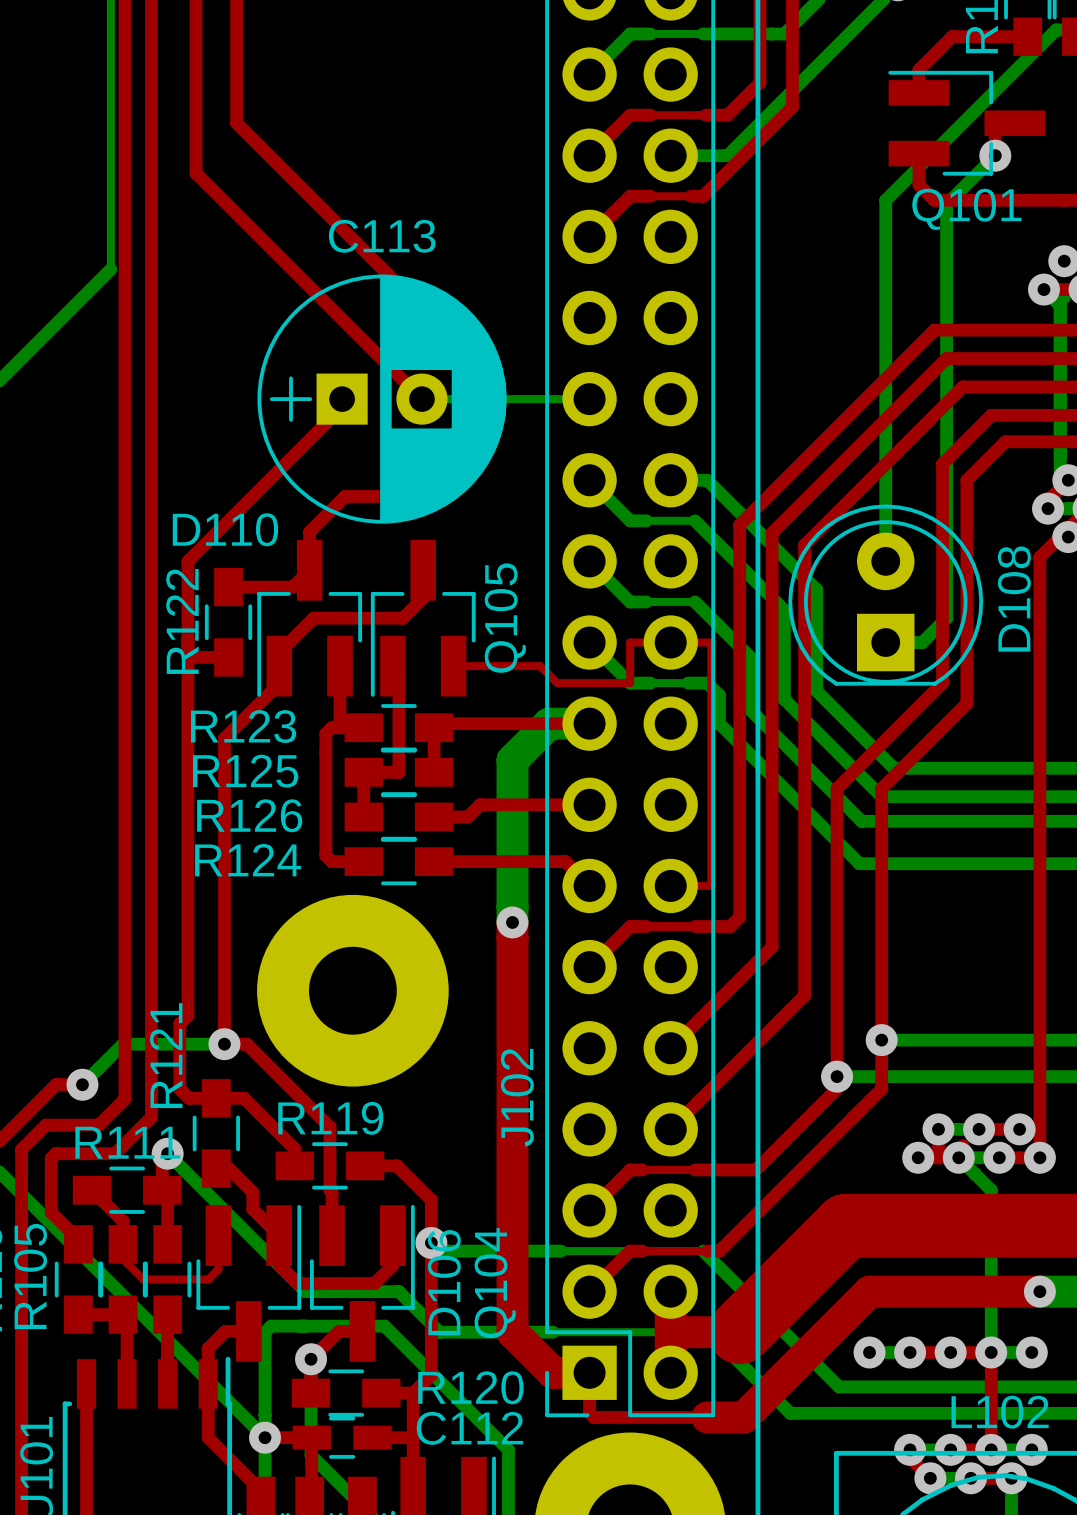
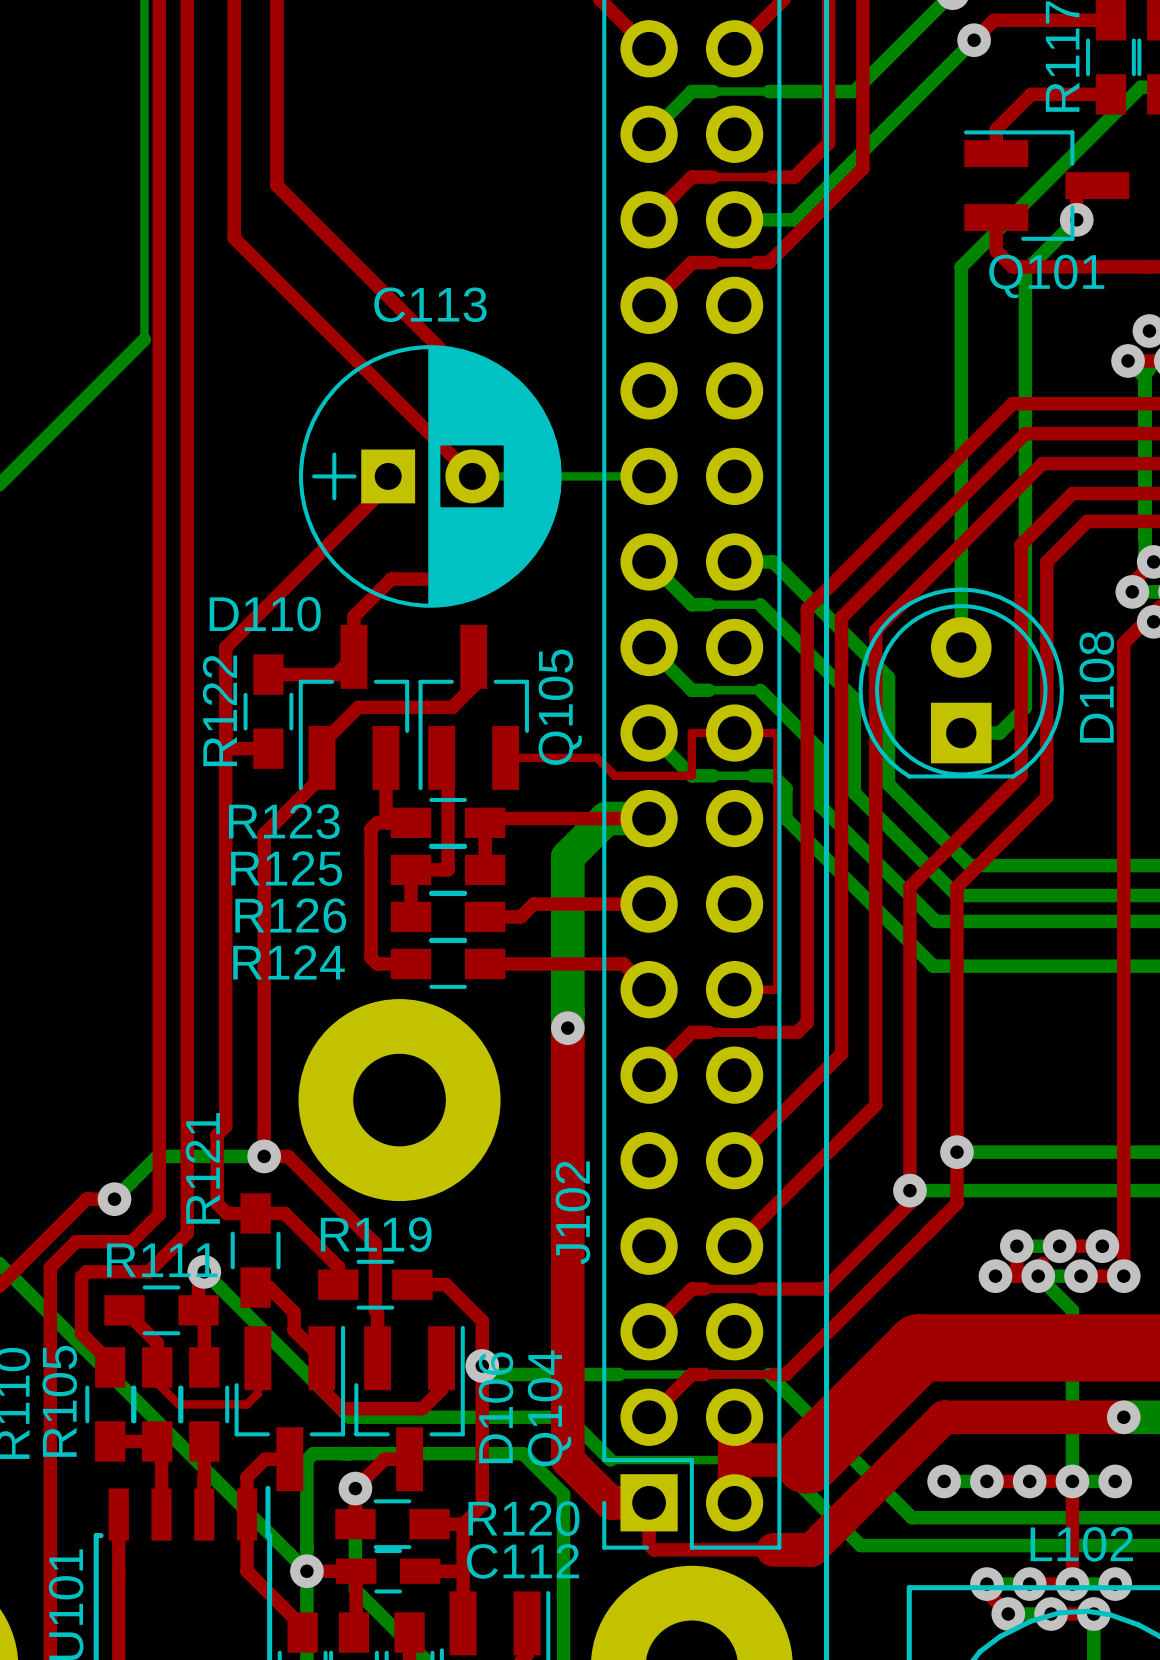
bottom track: (398, 1291) (439, 1332) (553, 1332) -> (448, 1417) (567, 1417) (610, 1460)
bottom track: (384, 1326) (508, 1449) -> (433, 1453) (522, 1453) (563, 1494) (563, 1584)

